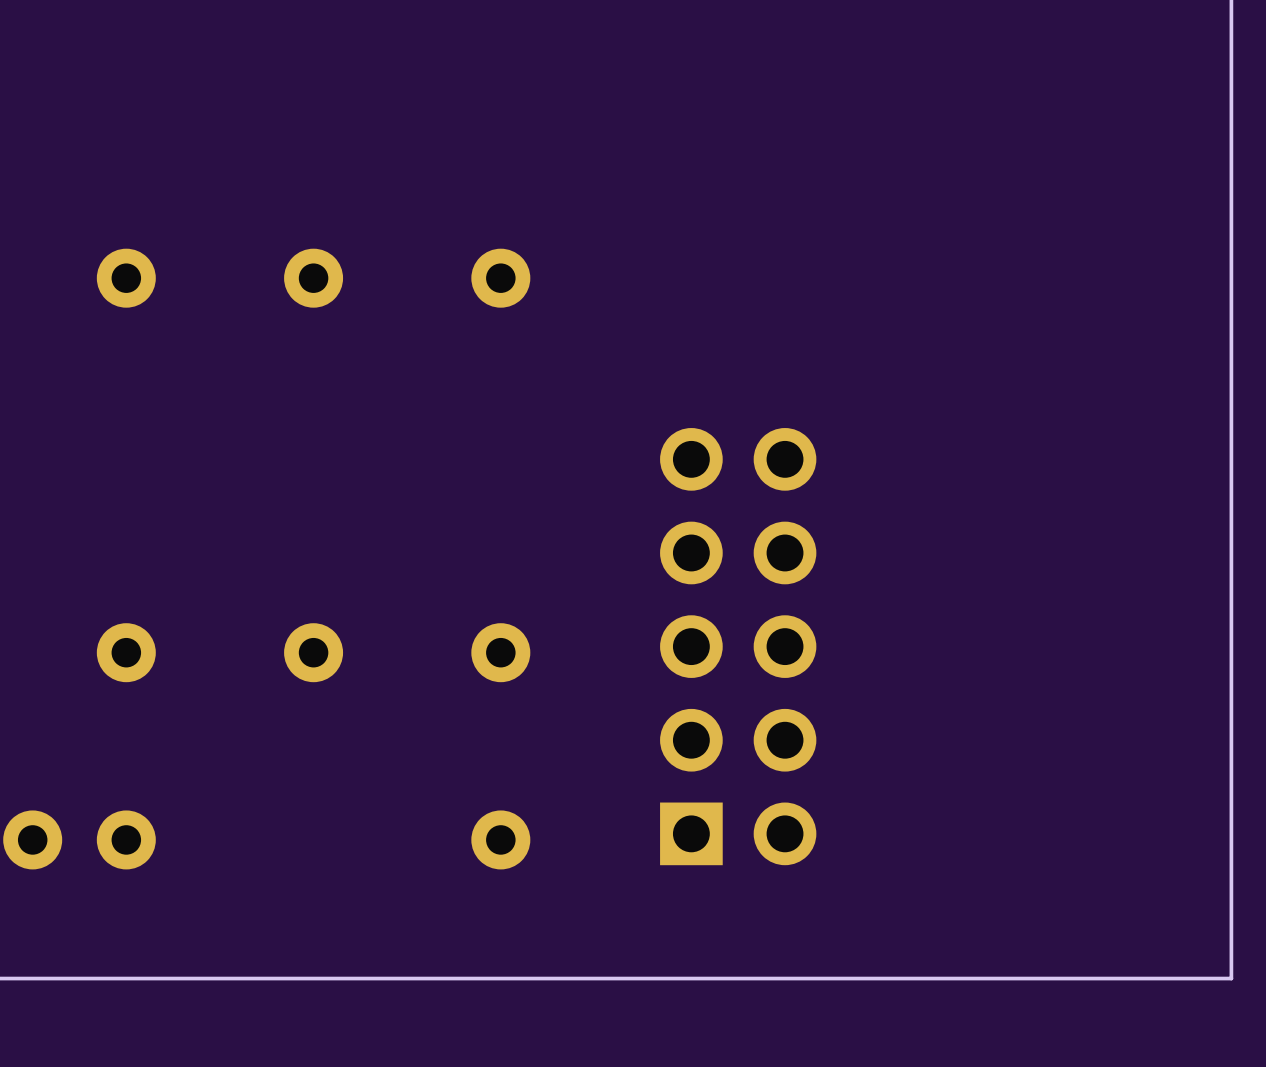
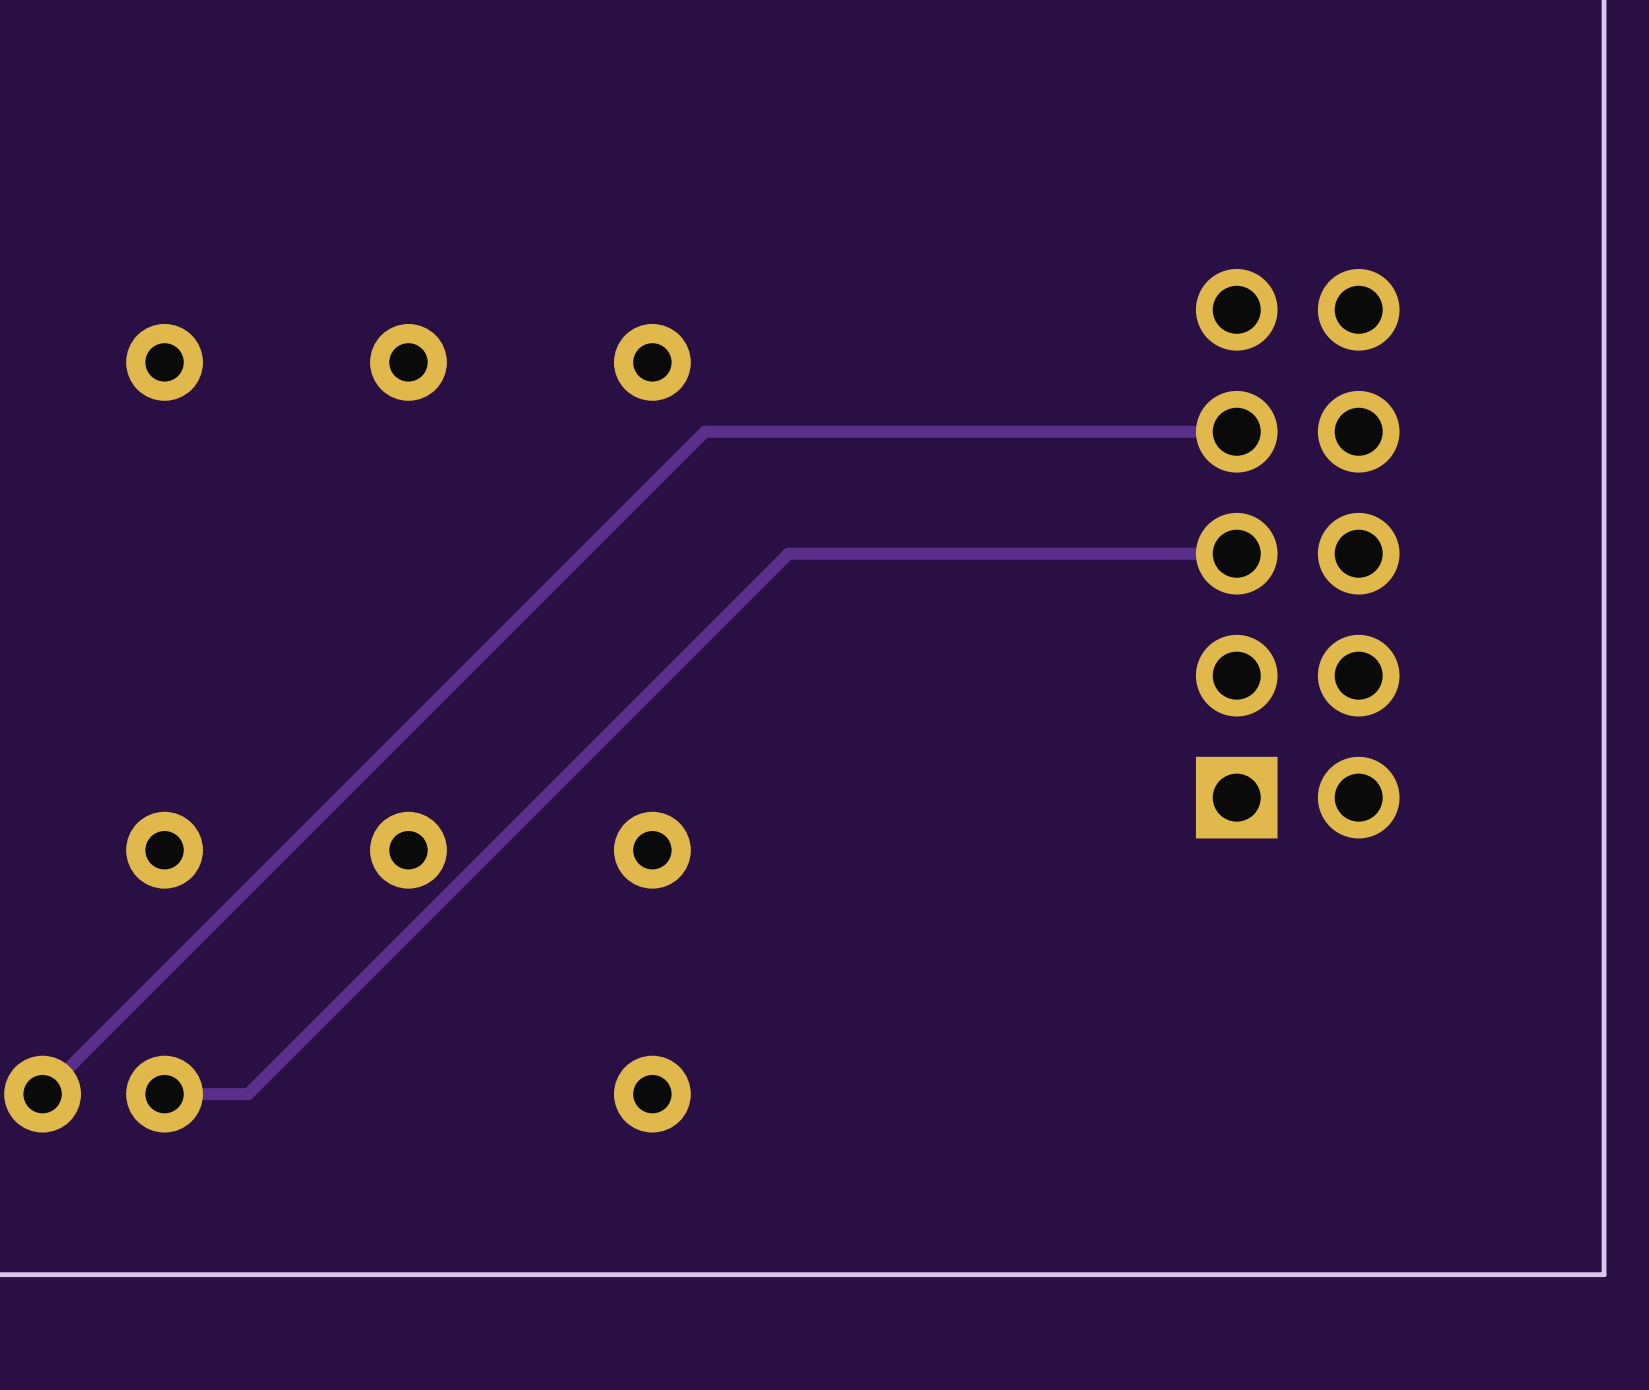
track: none -> (1236, 431) (704, 431) (42, 1094)
track: none -> (1236, 553) (788, 553) (248, 1094) (164, 1094)
part position: (738, 646) -> (1297, 553)

